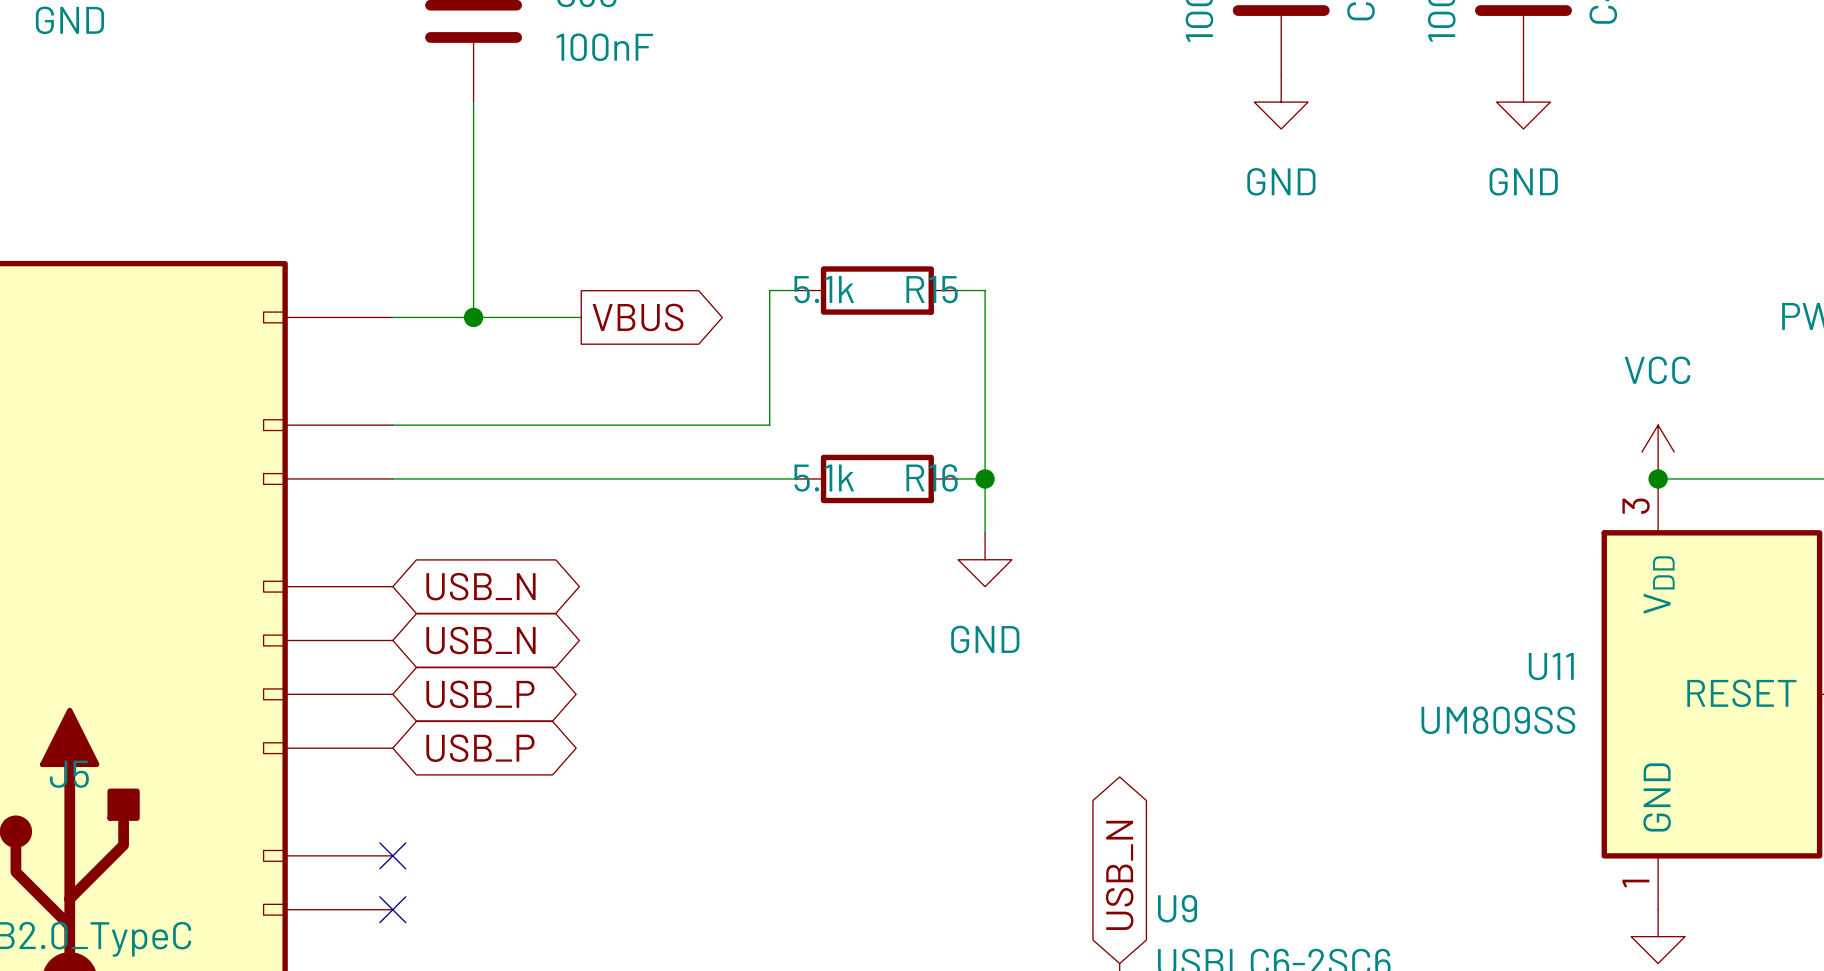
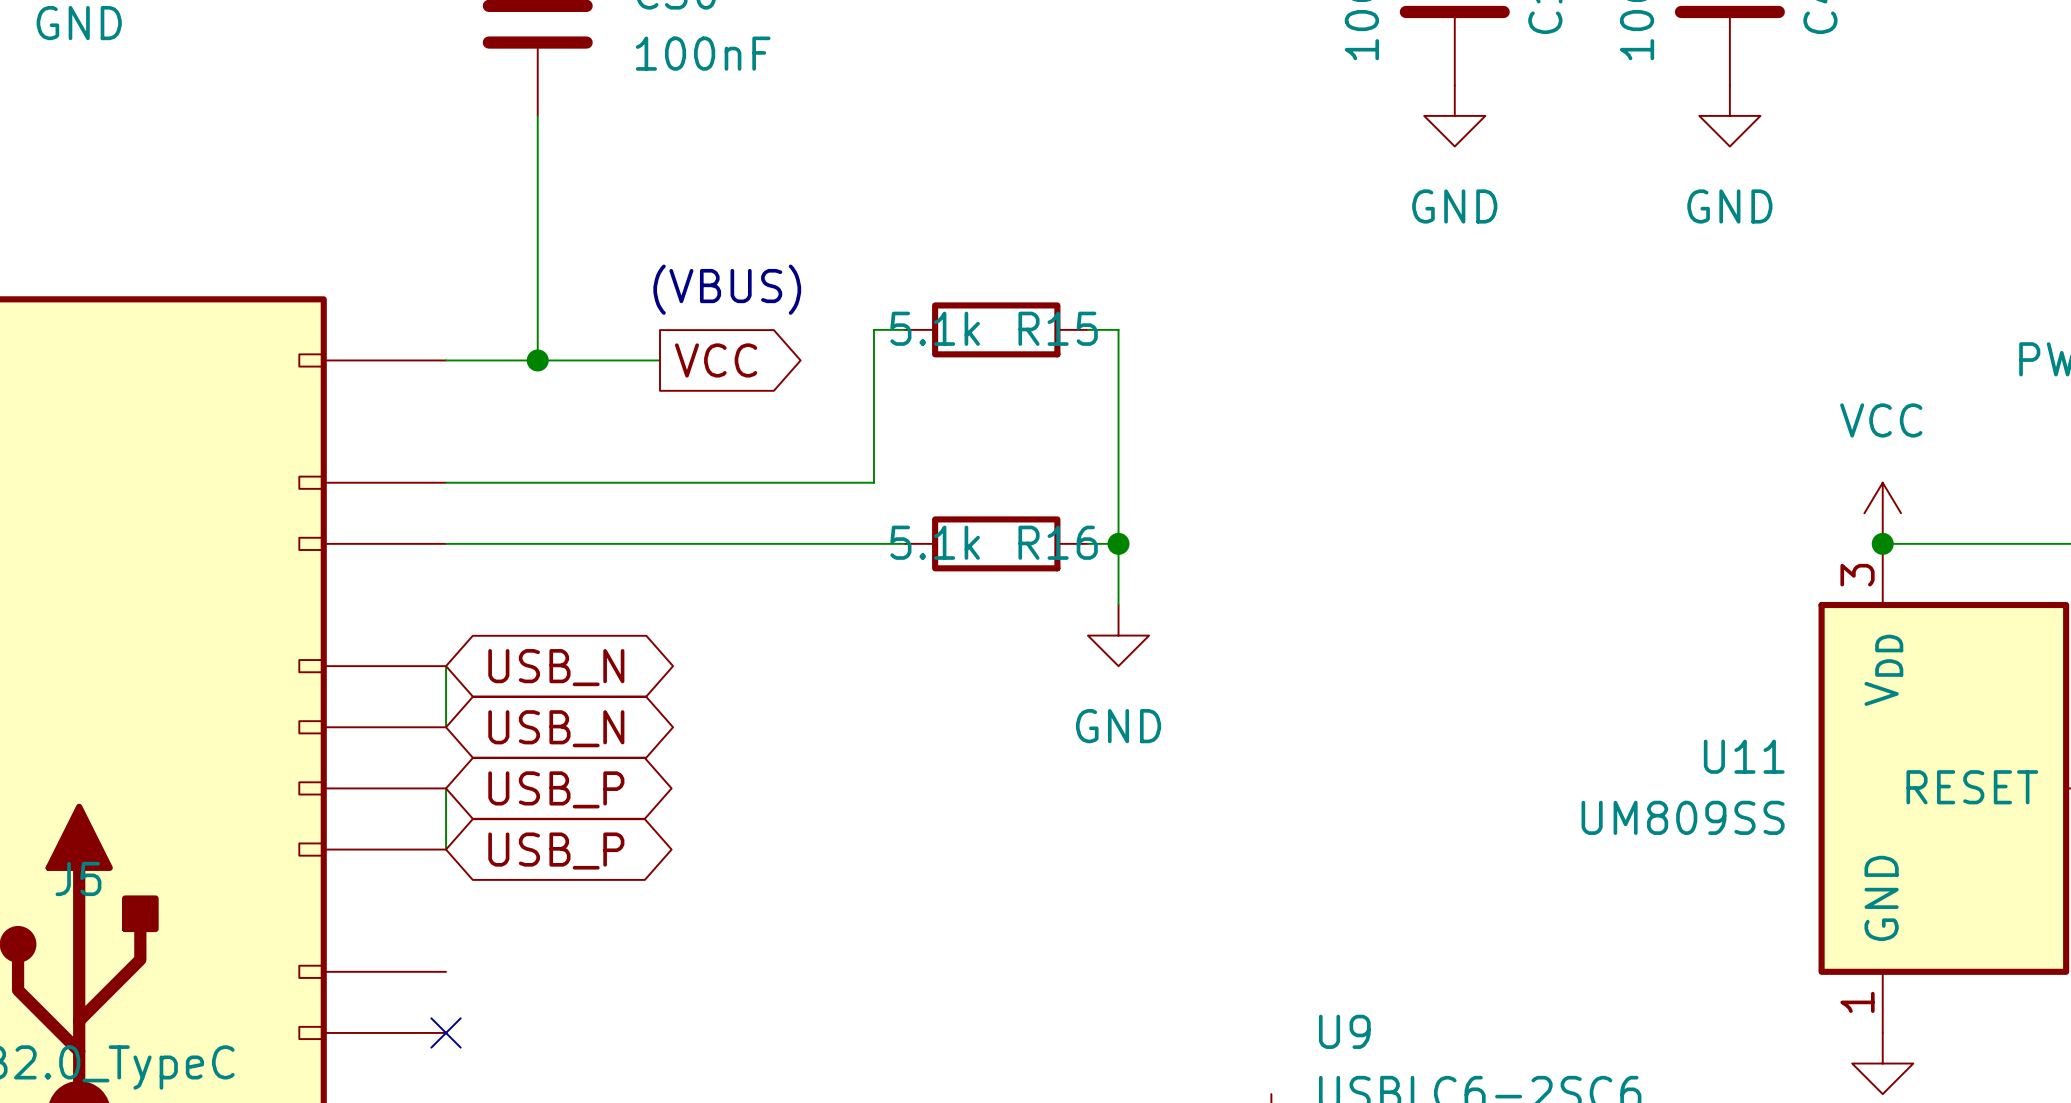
text: none -> (VBUS) (727, 289)
global label: VBUS (638, 317) -> VCC (716, 360)
wire: none -> (446, 666) (446, 727)
wire: none -> (446, 788) (446, 849)
no-connect mark: (392, 855) -> none
global label: USB_N (1119, 875) -> none

